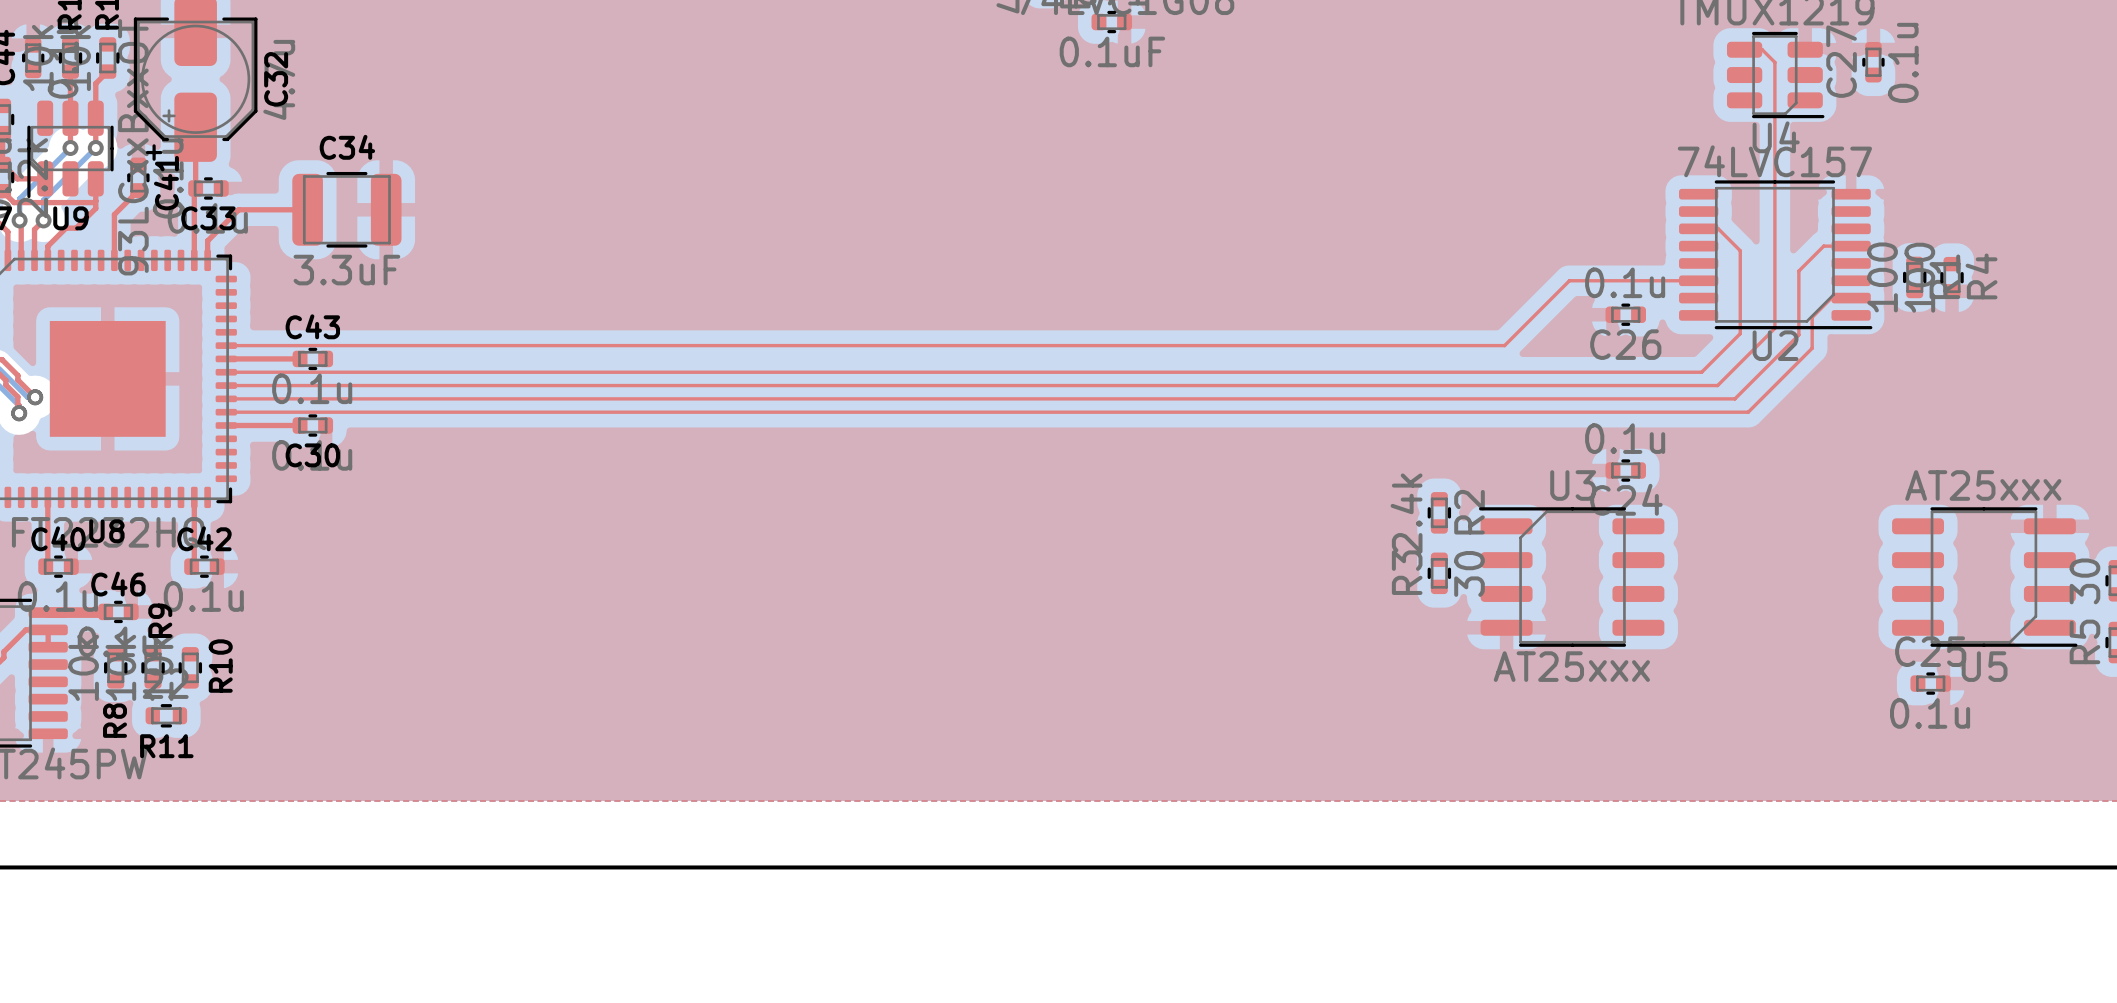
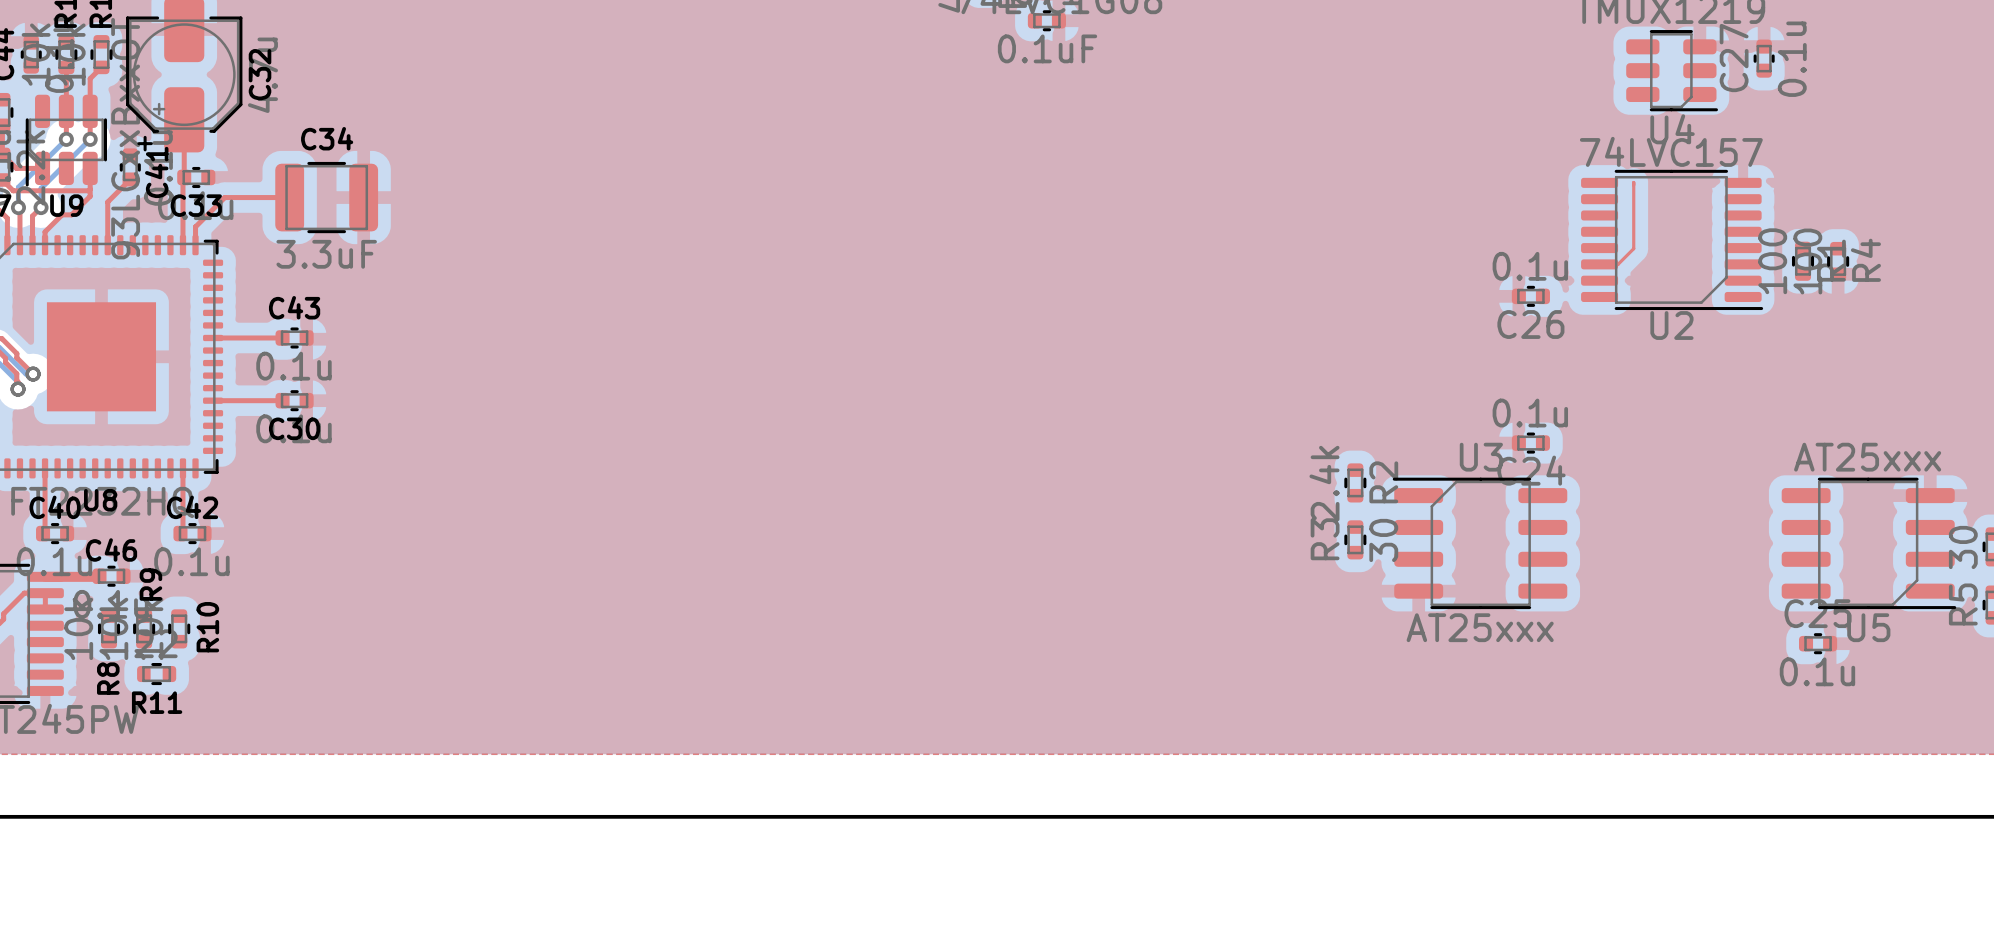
top track: (1744, 49) (1762, 49) (1774, 62) (1774, 328) (1717, 385) (226, 385) -> none
top track: (1698, 228) (1718, 228) (1740, 250) (1740, 333) (1701, 372) (226, 372) -> none
top track: (1851, 246) (1823, 246) (1798, 271) (1798, 334) (1734, 398) (226, 398) -> none
top track: (1698, 280) (1569, 280) (1504, 345) (226, 345) -> (1599, 264) (1618, 264) (1633, 248) (1633, 182)
top track: (1851, 298) (1831, 298) (1812, 317) (1812, 348) (1748, 412) (226, 412) -> none

